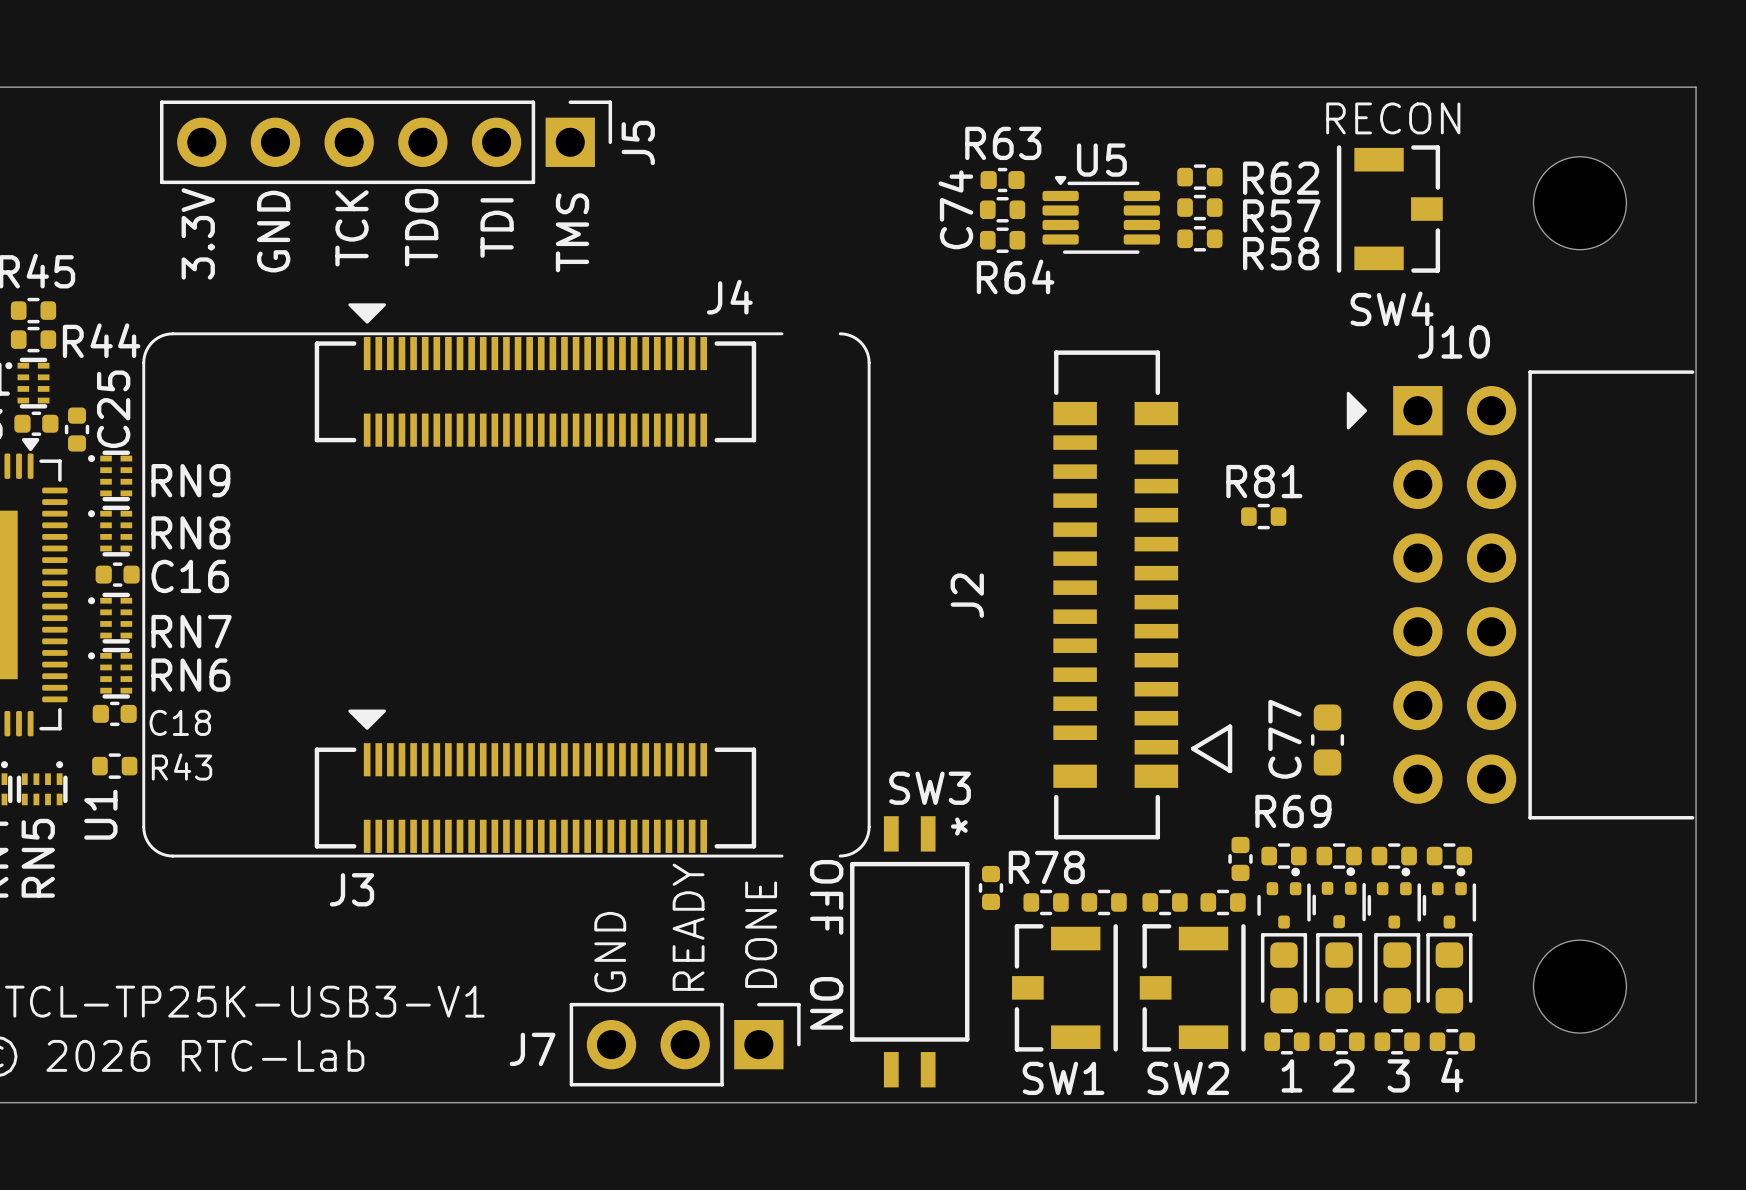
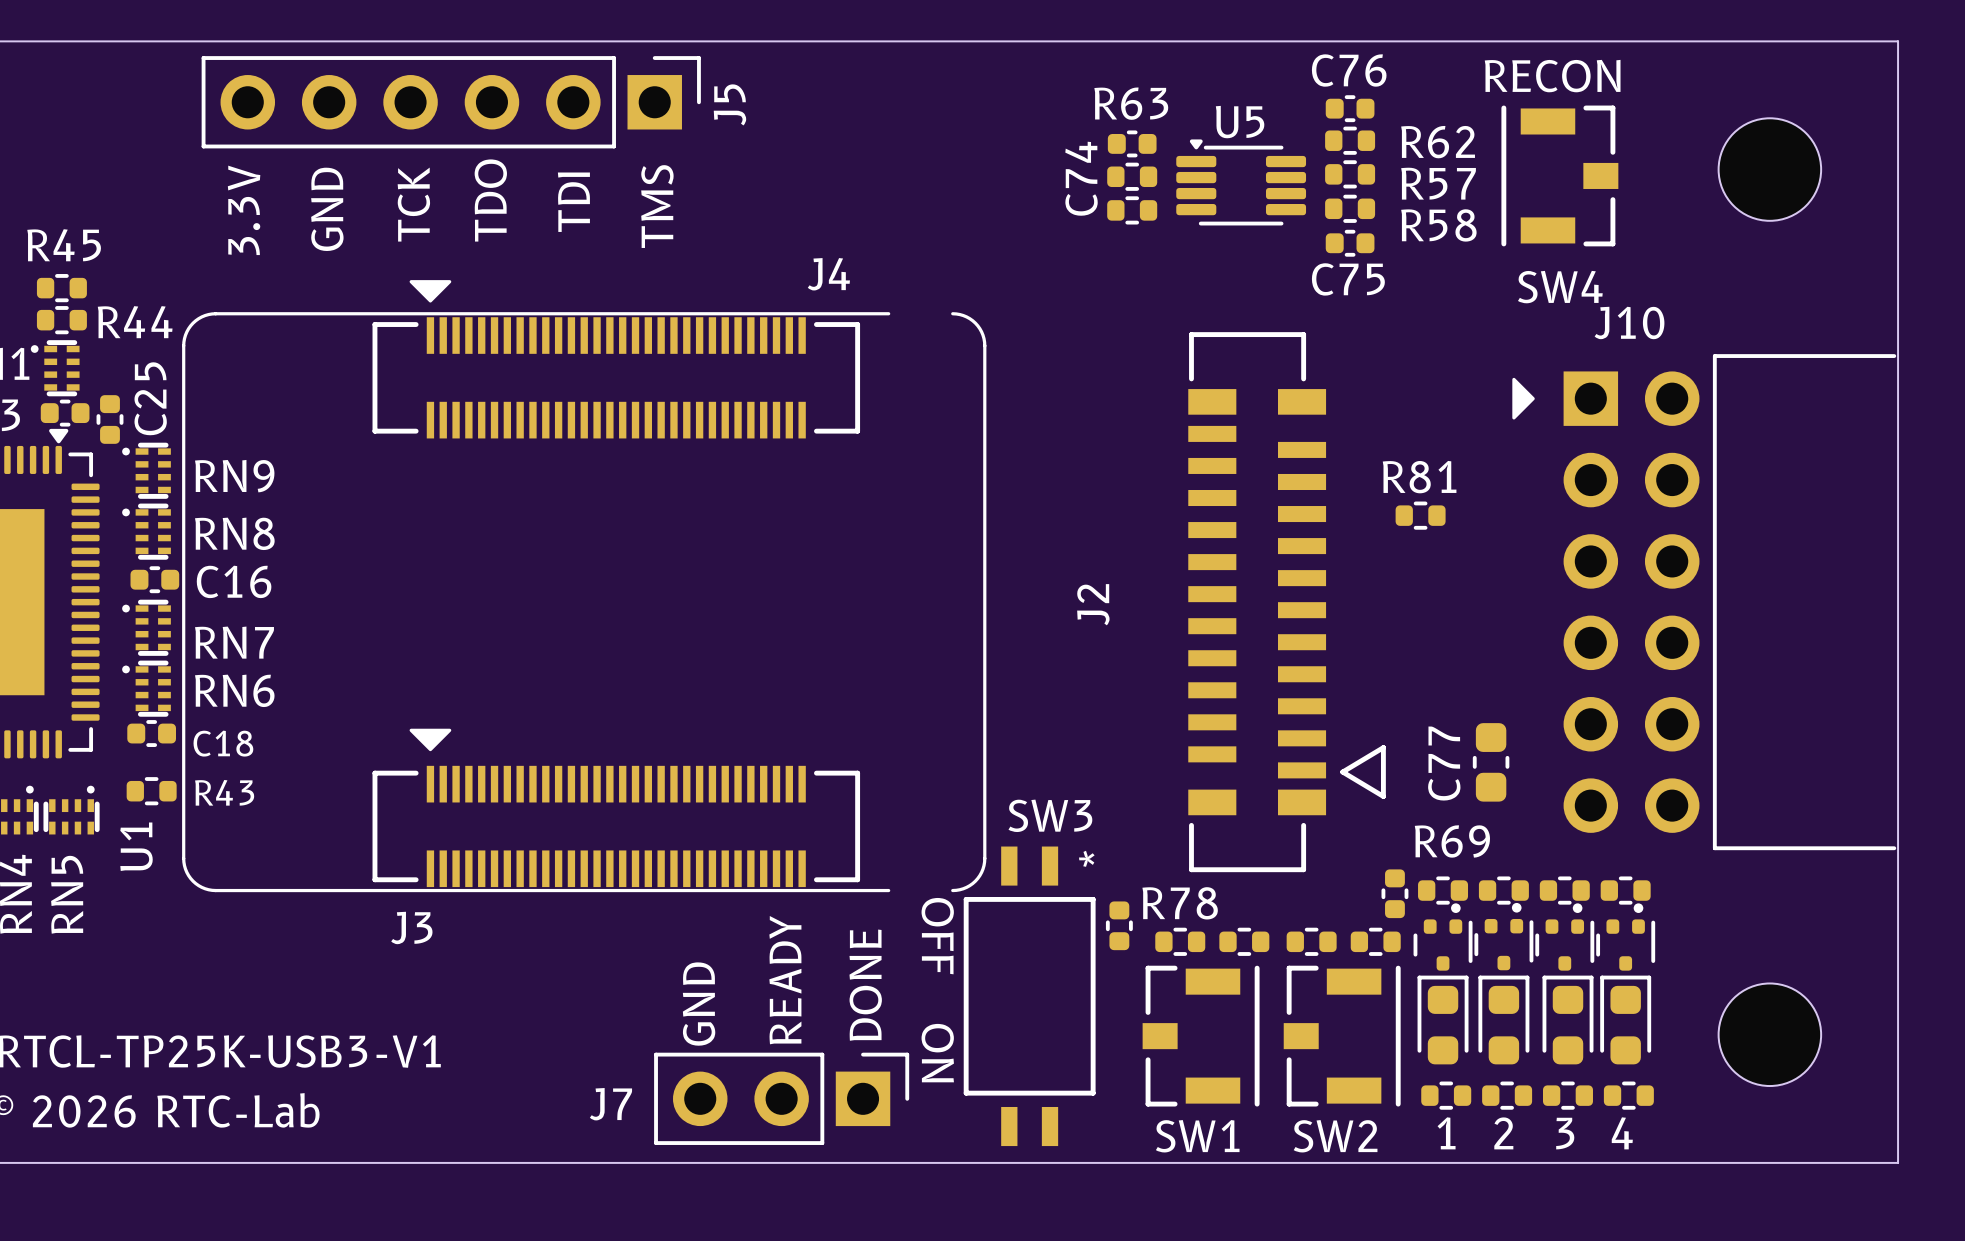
C76: none -> (1350, 108)
C75: none -> (1350, 243)
R64 name: R64 (1015, 276) -> none

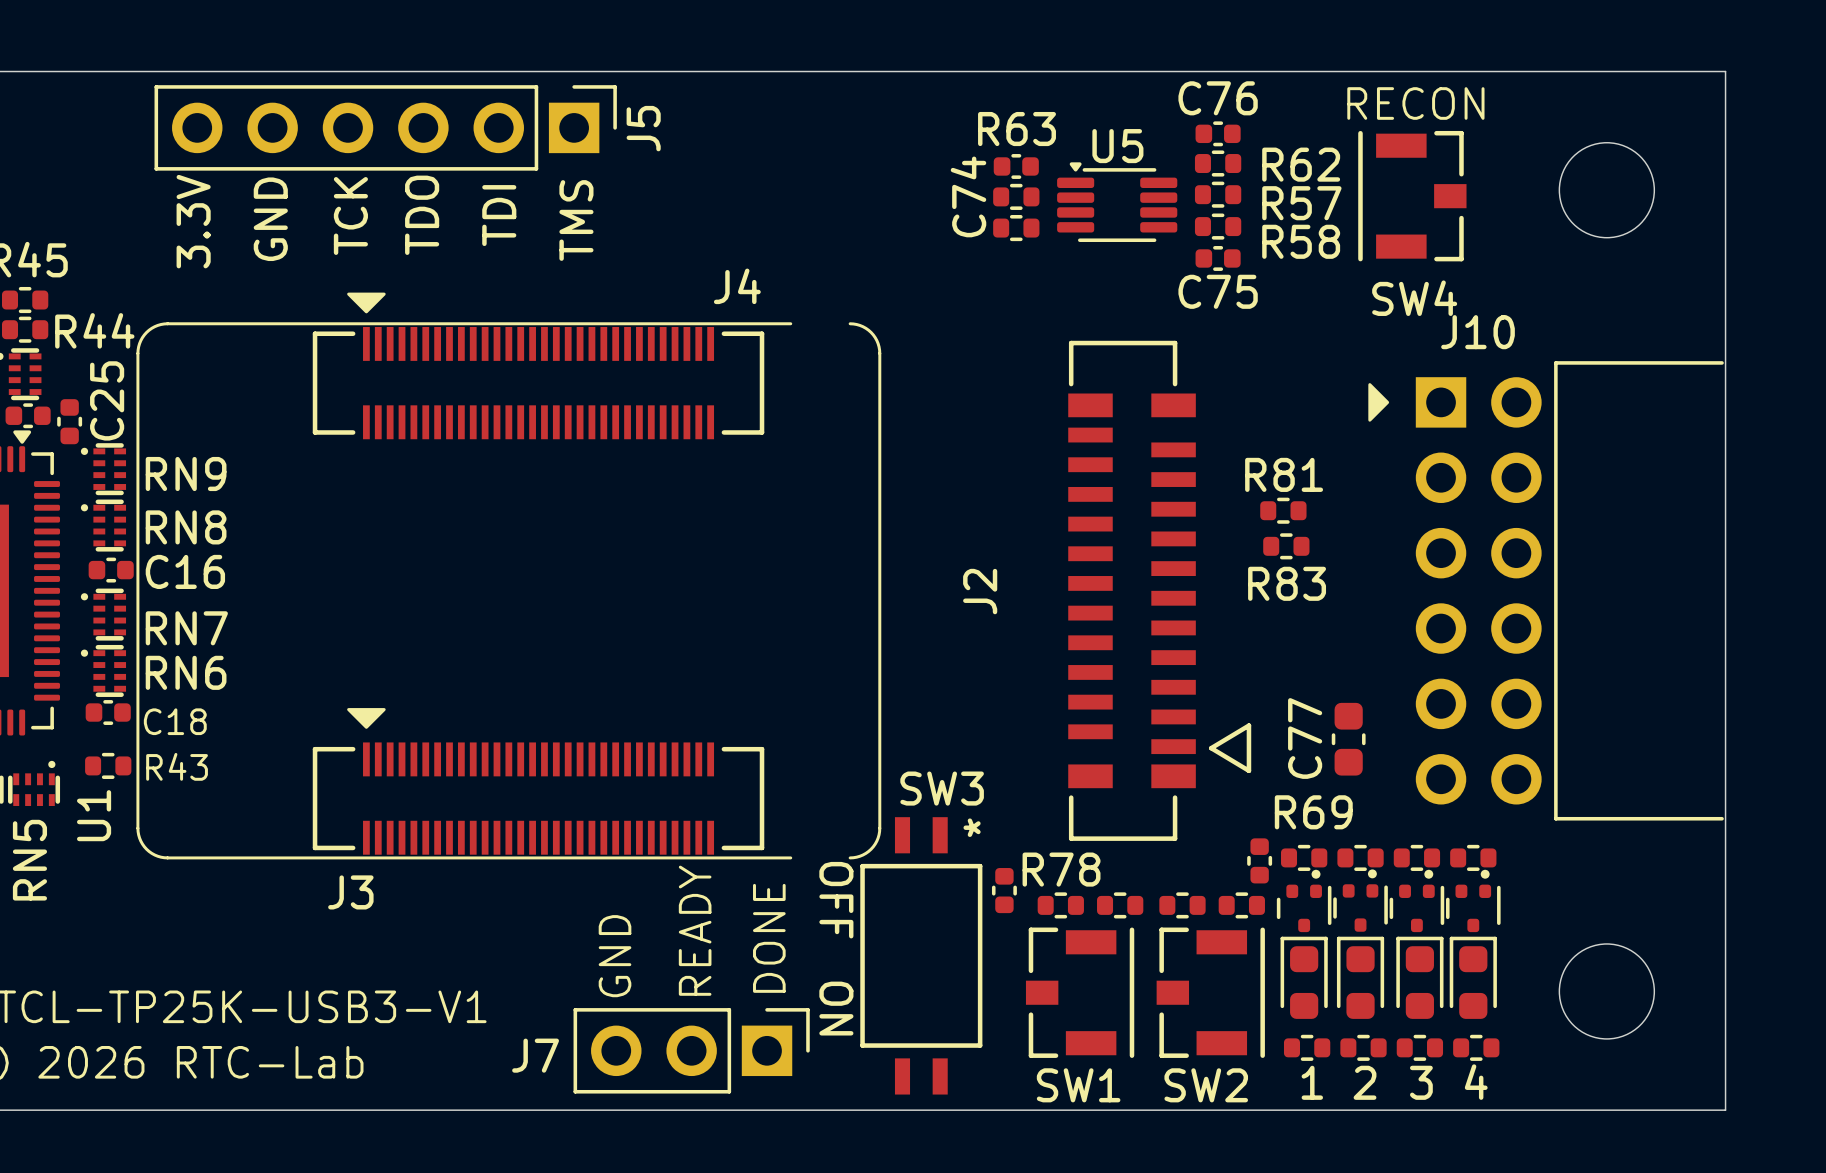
R83: none -> (1286, 546)

